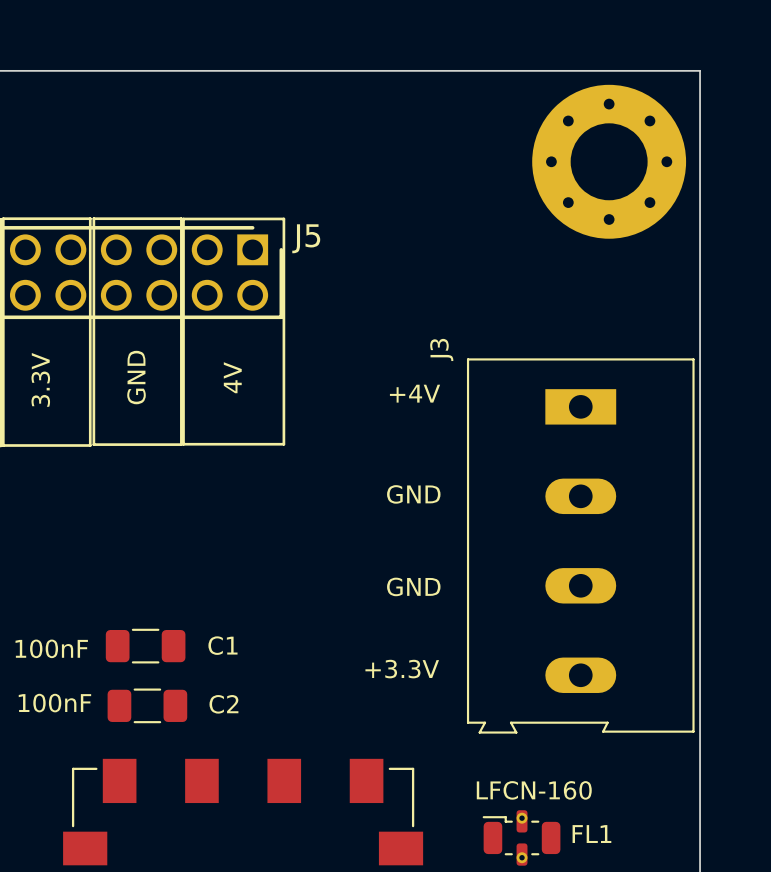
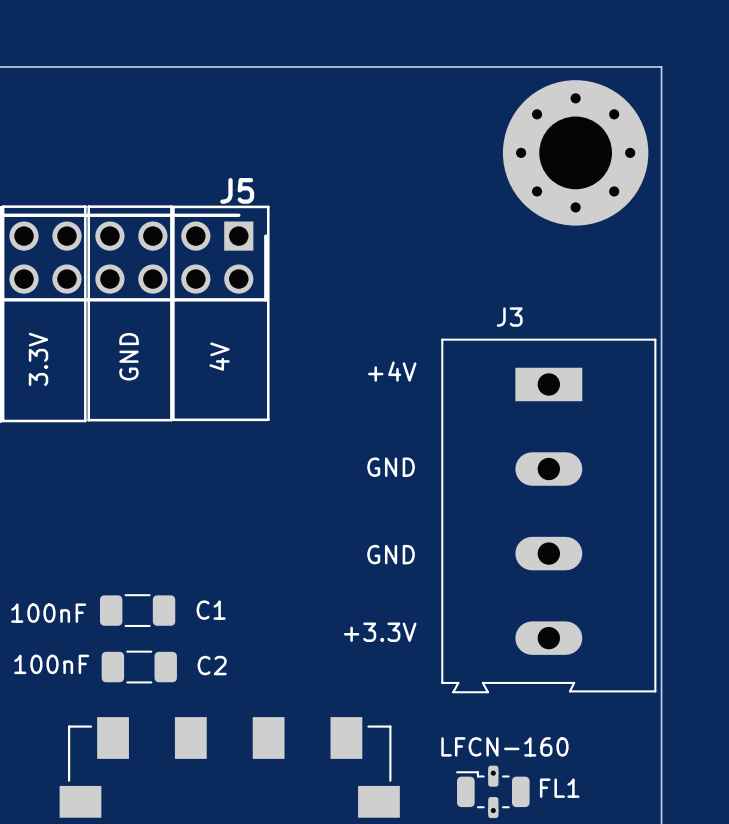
J5 name position: J5 (306, 238) -> J5 (237, 190)
J3 name rotation: 0° (441, 349) -> 90° clockwise (509, 317)
J3 name position: J3 (441, 349) -> J3 (509, 317)

